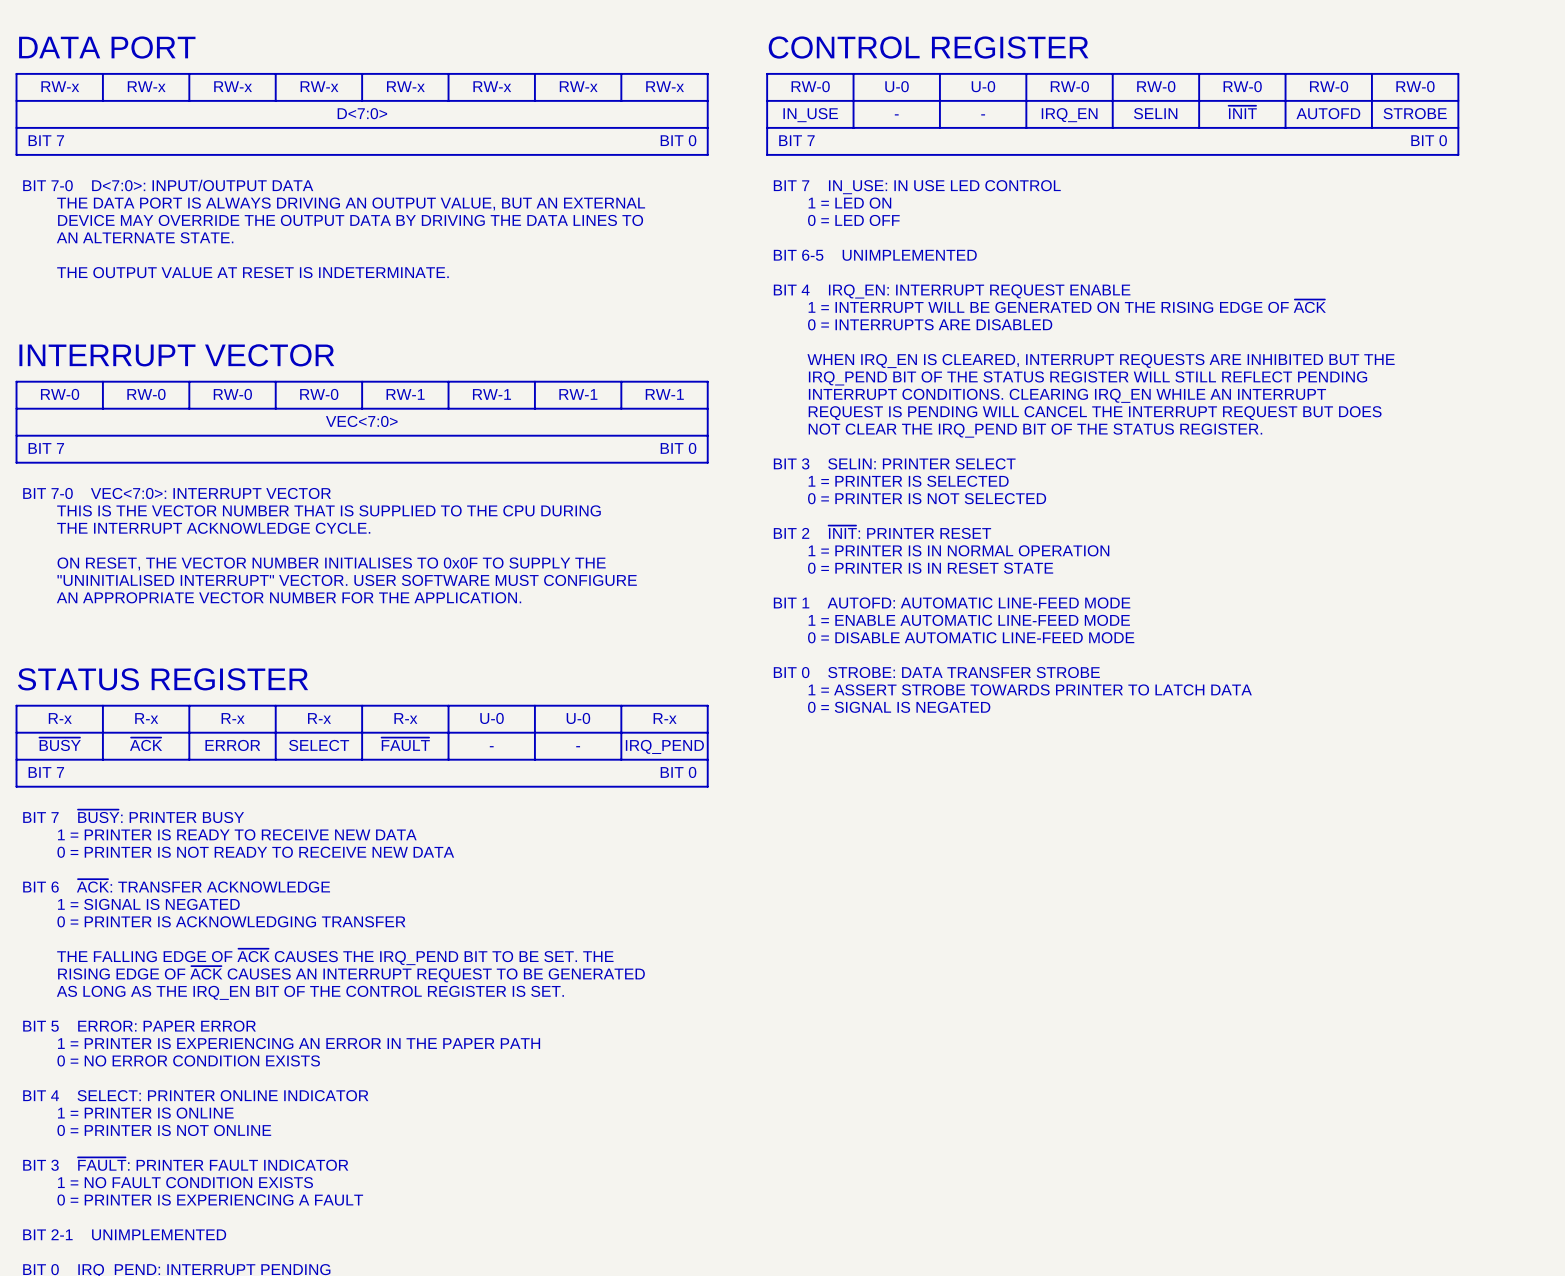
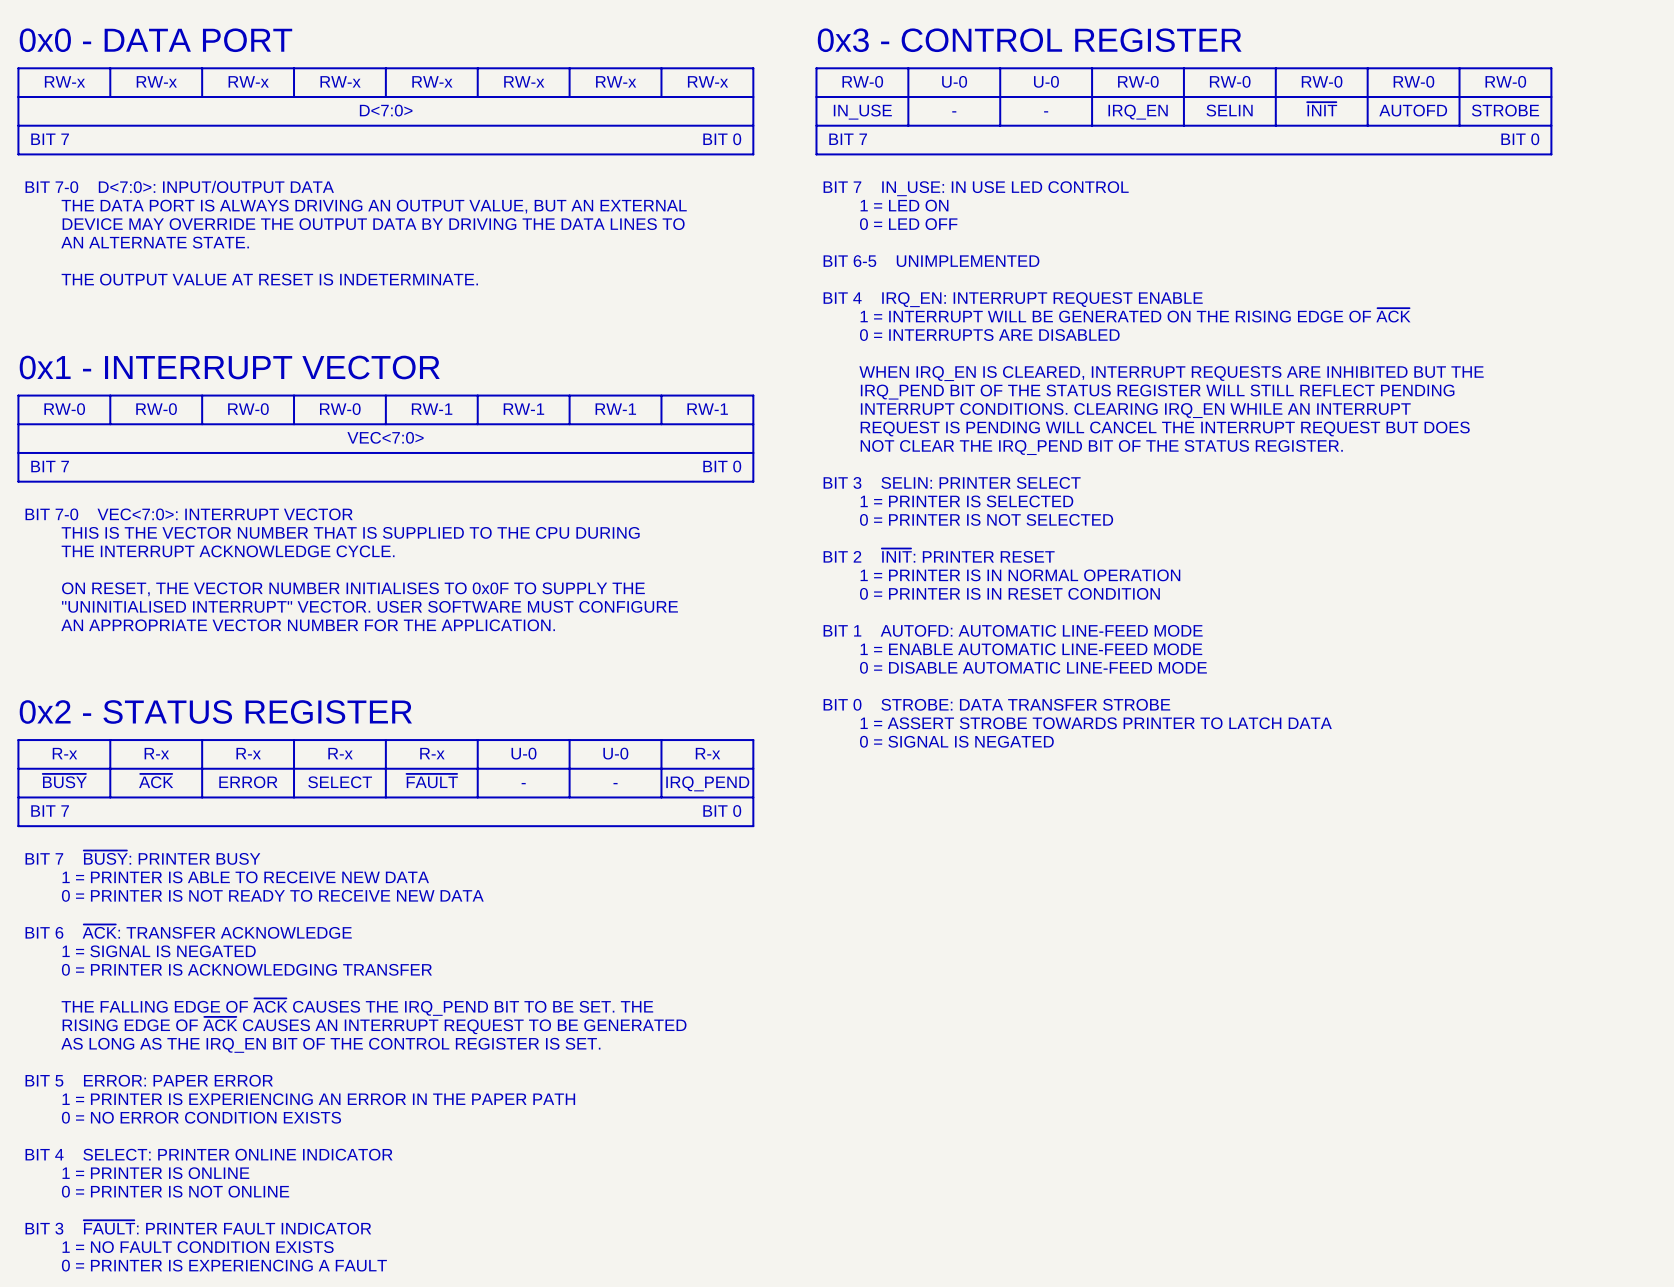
text: DATA PORT (107, 47) -> 0x0 - DATA PORT (155, 40)
text: CONTROL REGISTER (928, 47) -> 0x3 - CONTROL REGISTER (1029, 40)
text: INTERRUPT VECTOR (176, 355) -> 0x1 - INTERRUPT VECTOR (229, 367)
text: 0 = PRINTER IS IN RESET STATE (930, 568) -> 0 = PRINTER IS IN RESET CONDITION (1009, 593)
text: STATUS REGISTER (163, 679) -> 0x2 - STATUS REGISTER (215, 712)
text: 1 = PRINTER IS READY TO RECEIVE NEW DATA (237, 834) -> 1 = PRINTER IS ABLE TO RECEIVE NEW DATA (245, 877)

